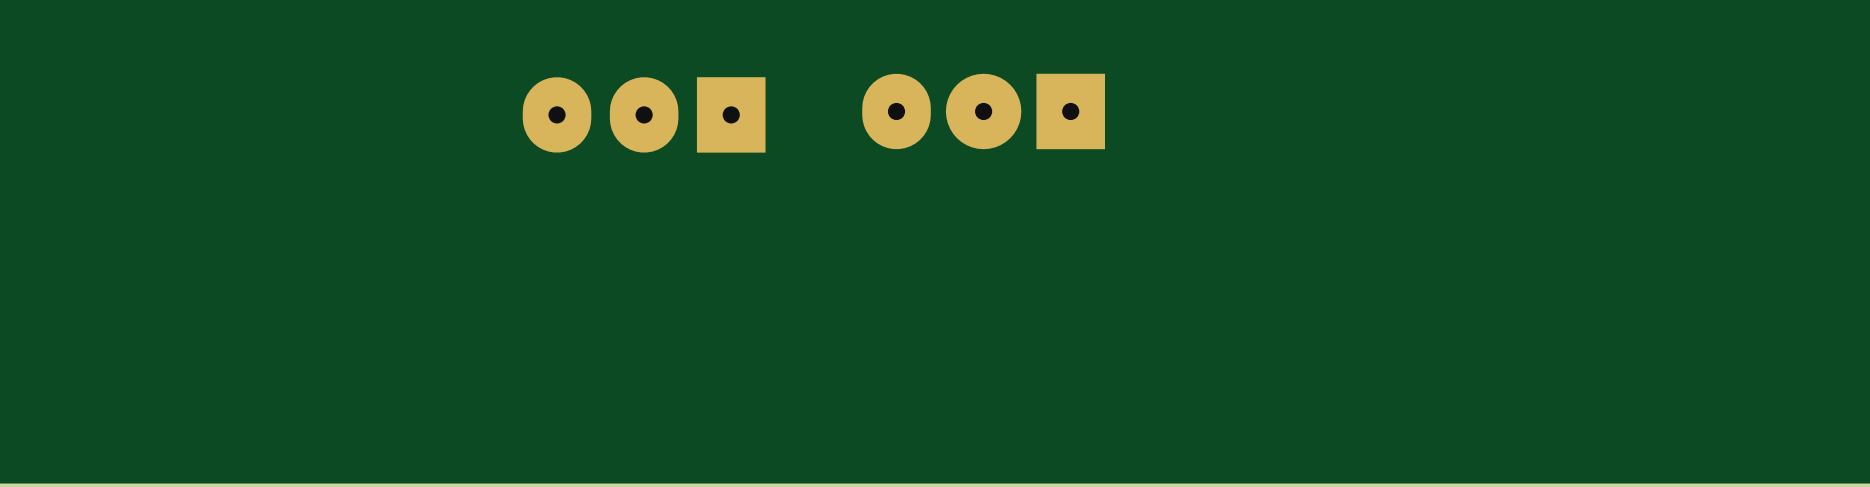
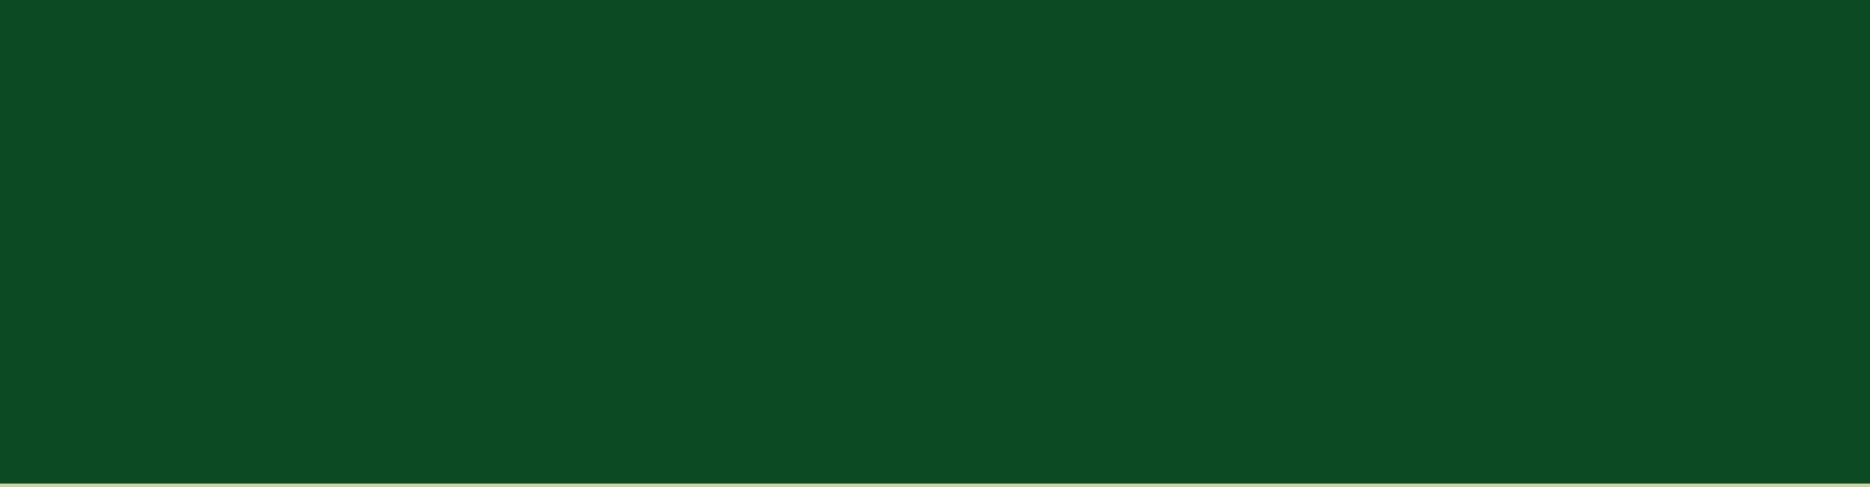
part: (983, 111) -> none
part: (644, 114) -> none

